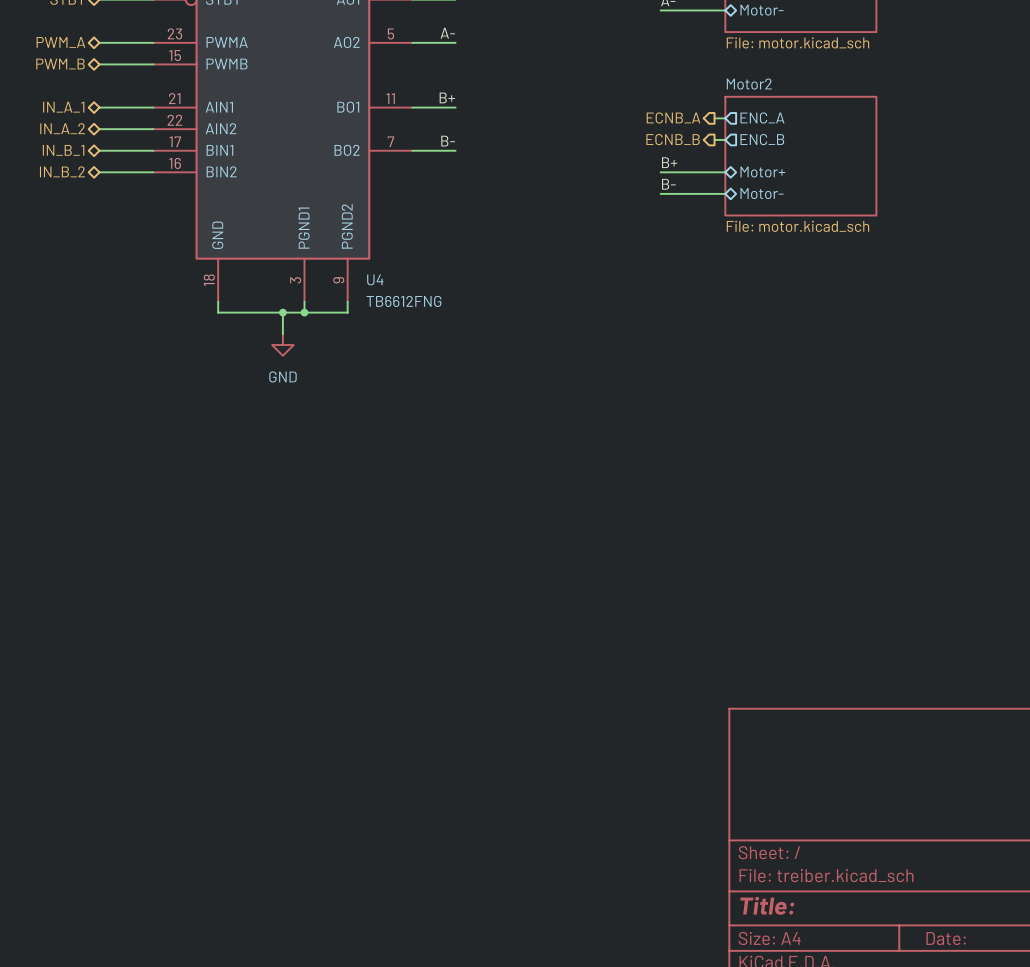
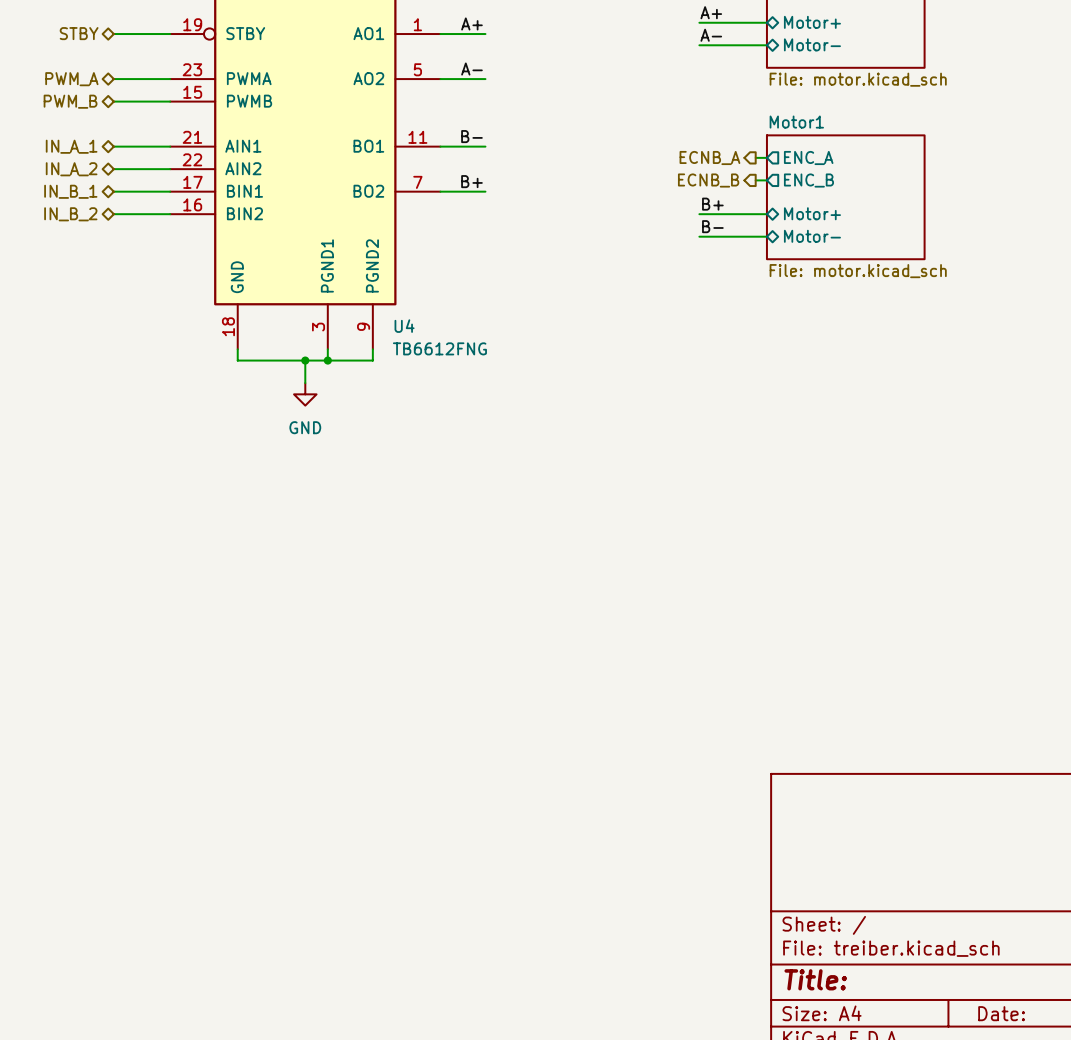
sheet Motor2 name: Motor2 (749, 84) -> Motor1 (796, 122)
label: B+ (447, 97) -> B- (471, 136)
label: B- (448, 141) -> B+ (471, 181)

